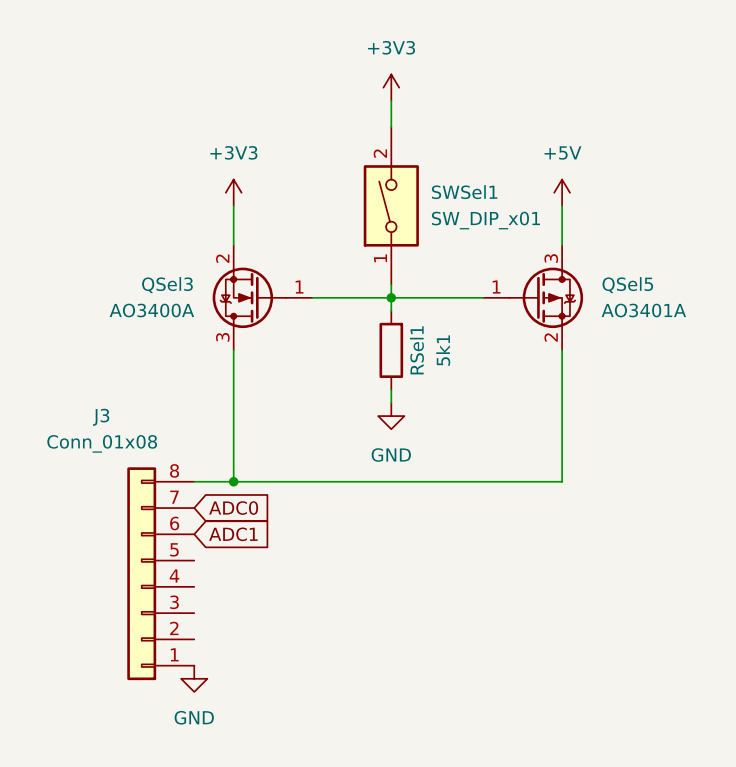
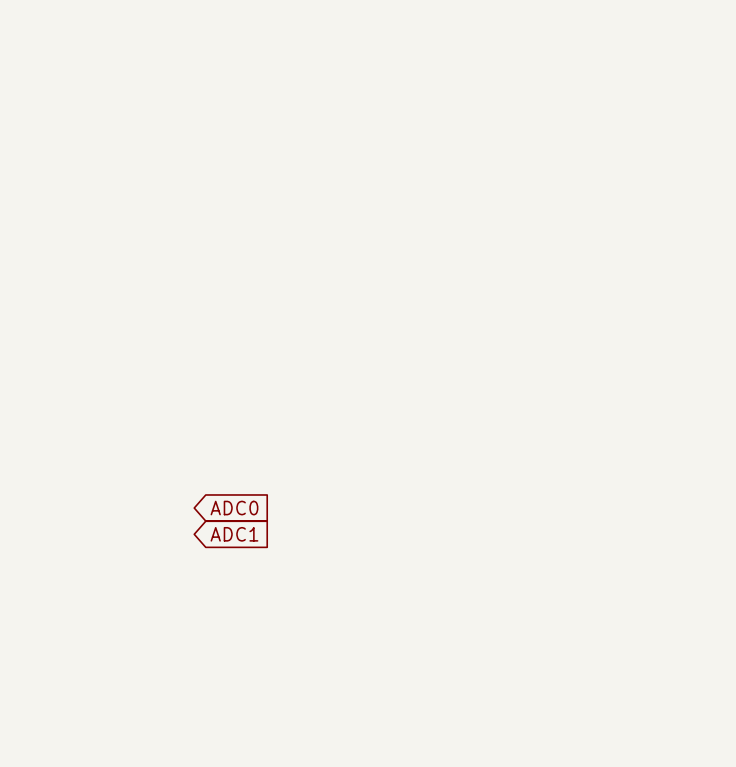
power symbol: +3V3 (391, 87) -> none
wire: (391, 100) (391, 127) -> none
power symbol: +3V3 (233, 192) -> none
power symbol: +5V (562, 192) -> none
wire: (233, 205) (233, 245) -> none
SWSel1: SW_DIP_x01 (391, 205) -> none
wire: (562, 205) (562, 245) -> none
wire: (391, 284) (391, 310) -> none
QSel3: AO3400A (262, 297) -> none
wire: (312, 297) (483, 297) -> none
junction: (391, 297) -> none
QSel5: AO3401A (533, 297) -> none
wire: (233, 350) (233, 481) -> none
RSel1: 5k1 (391, 350) -> none
wire: (562, 350) (562, 481) (194, 481) -> none
wire: (391, 389) (391, 402) -> none
power symbol: GND (391, 416) -> none
junction: (233, 481) -> none
J3: Conn_01x08 (160, 573) -> none
power symbol: GND (194, 678) -> none

